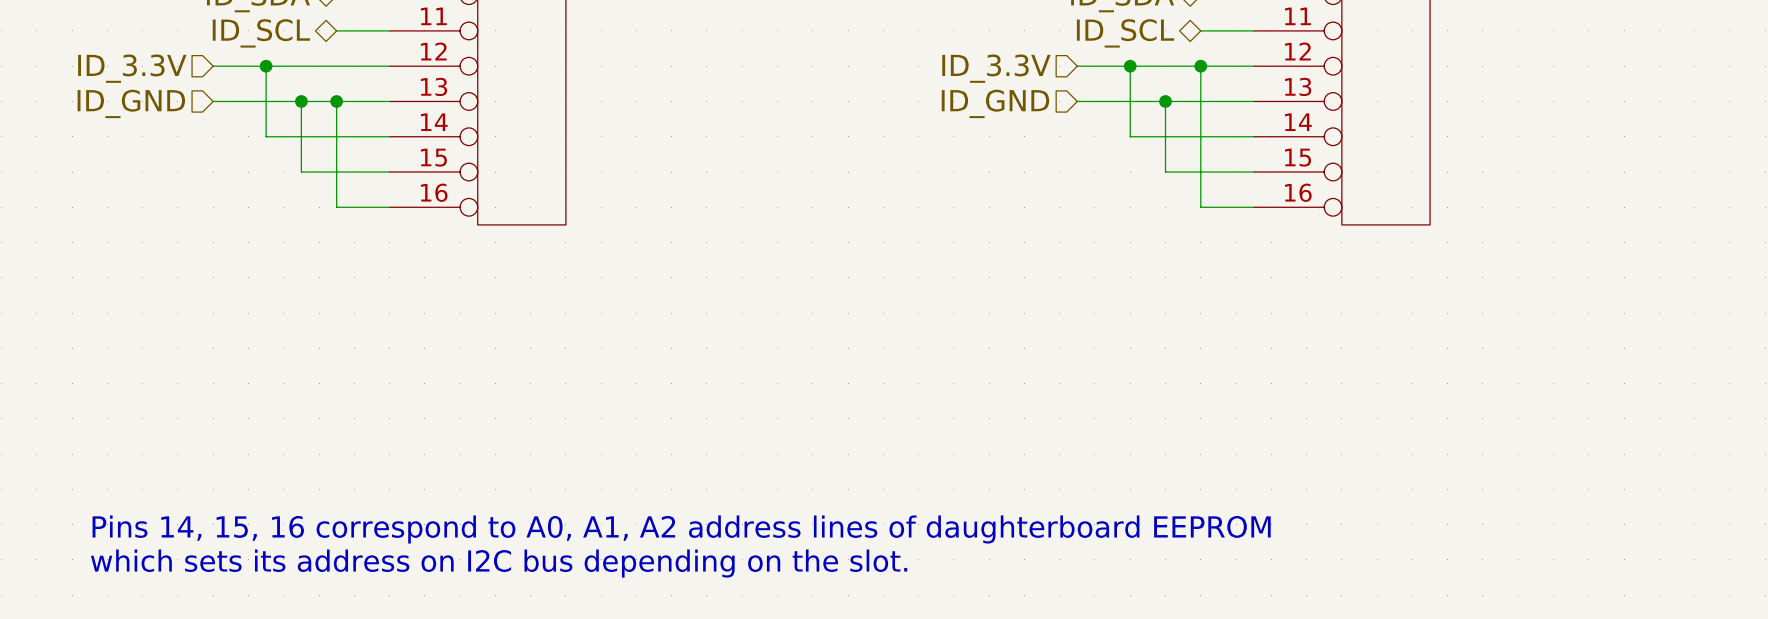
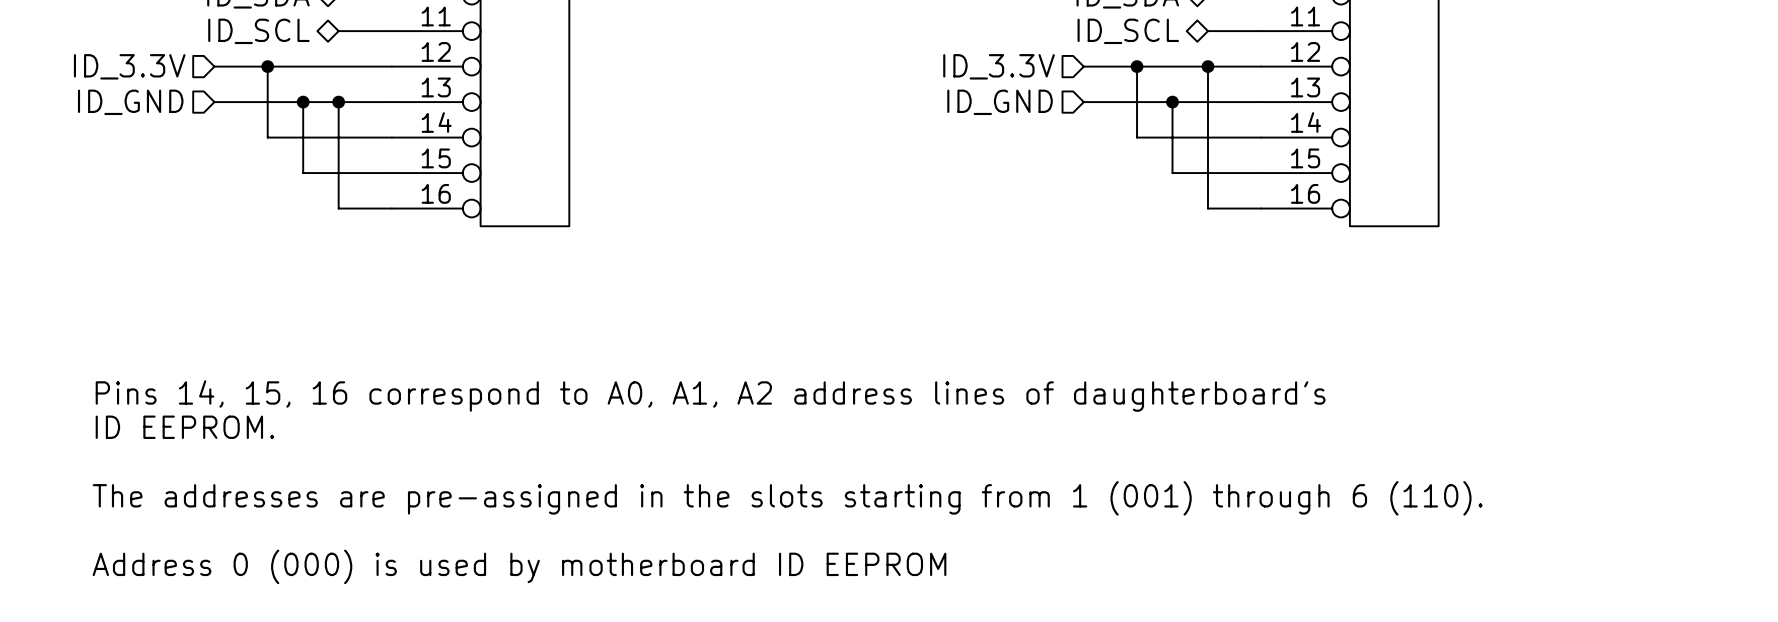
text: none -> Pins 14, 15, 16 correspond to A0, A1, A2 address lines of daughterboard's (710, 396)
text: none -> ID EEPROM. (184, 427)
text: none -> The addresses are pre-assigned in the slots starting from 1 (001) through 6 (110). (787, 498)
text: Pins 14, 15, 16 correspond to A0, A1, A2 address lines of daughterboard EEPROM (681, 529) -> none
text: which sets its address on I2C bus depending on the slot. (499, 563) -> Address 0 (000) is used by motherboard ID EEPROM (519, 566)

